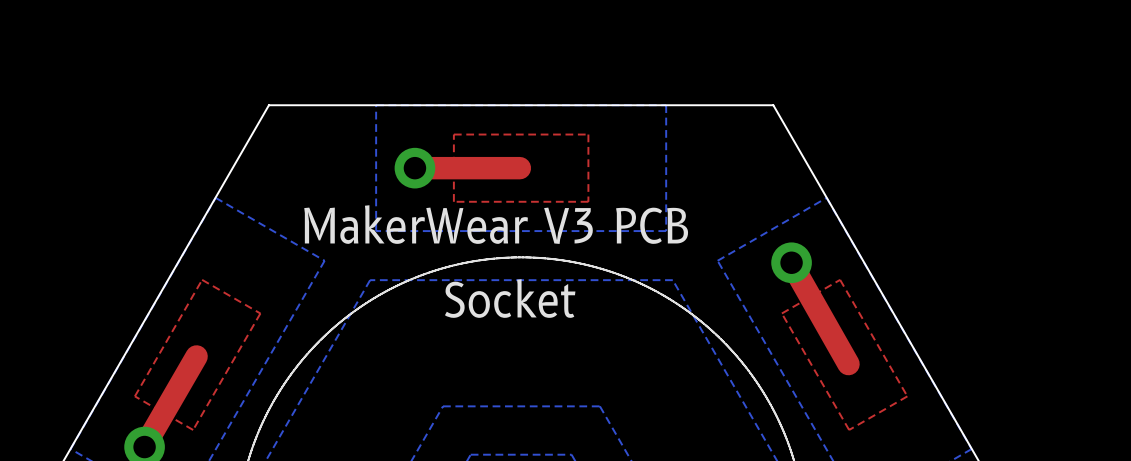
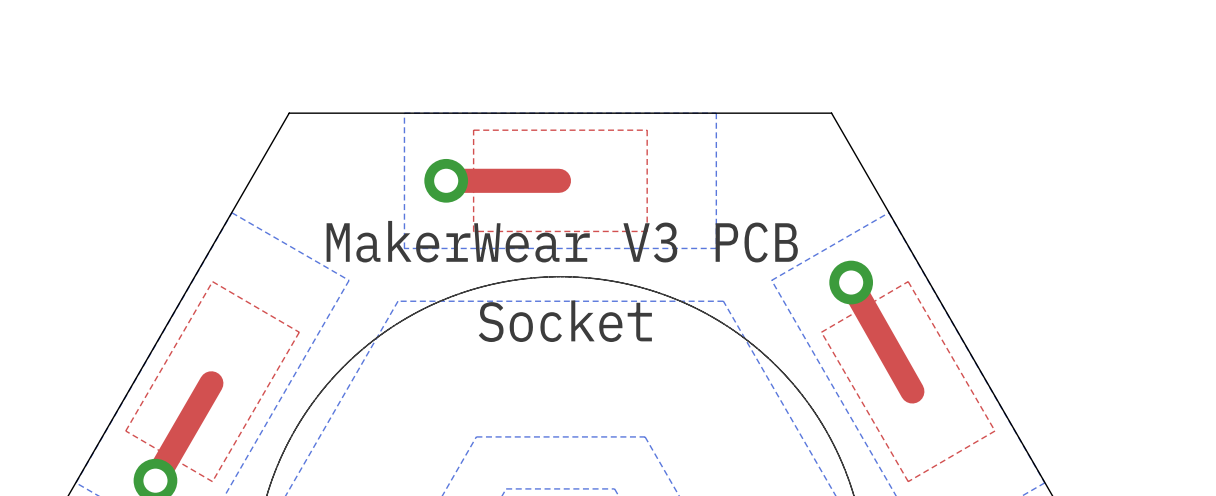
top zone outline: (453, 134) (453, 201) (588, 201) (588, 134) (453, 134) -> (473, 130) (473, 231) (647, 231) (647, 130) (473, 130)
top zone outline: (202, 279) (134, 396) (193, 429) (260, 313) (202, 279) -> (212, 281) (125, 431) (212, 481) (299, 332) (212, 281)
top zone outline: (840, 279) (781, 313) (849, 429) (907, 396) (840, 279) -> (908, 281) (821, 332) (908, 481) (994, 431) (908, 281)

